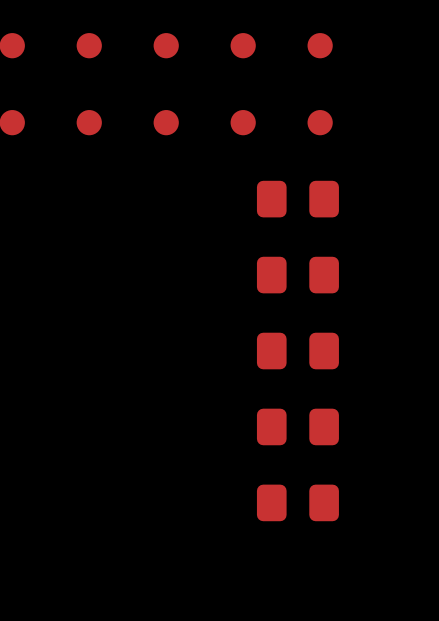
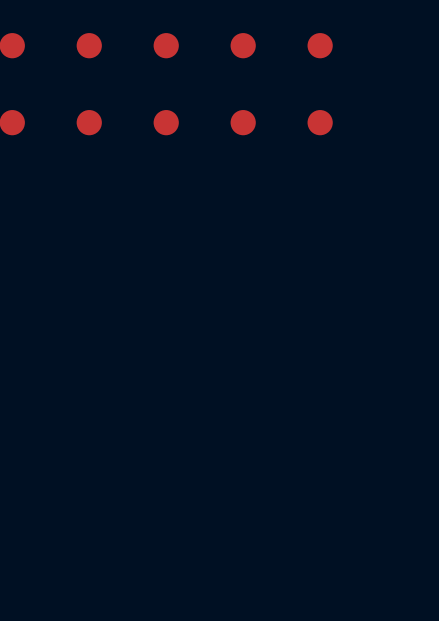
part: (297, 199) -> none
part: (297, 275) -> none
part: (297, 351) -> none
part: (297, 426) -> none
part: (297, 502) -> none

